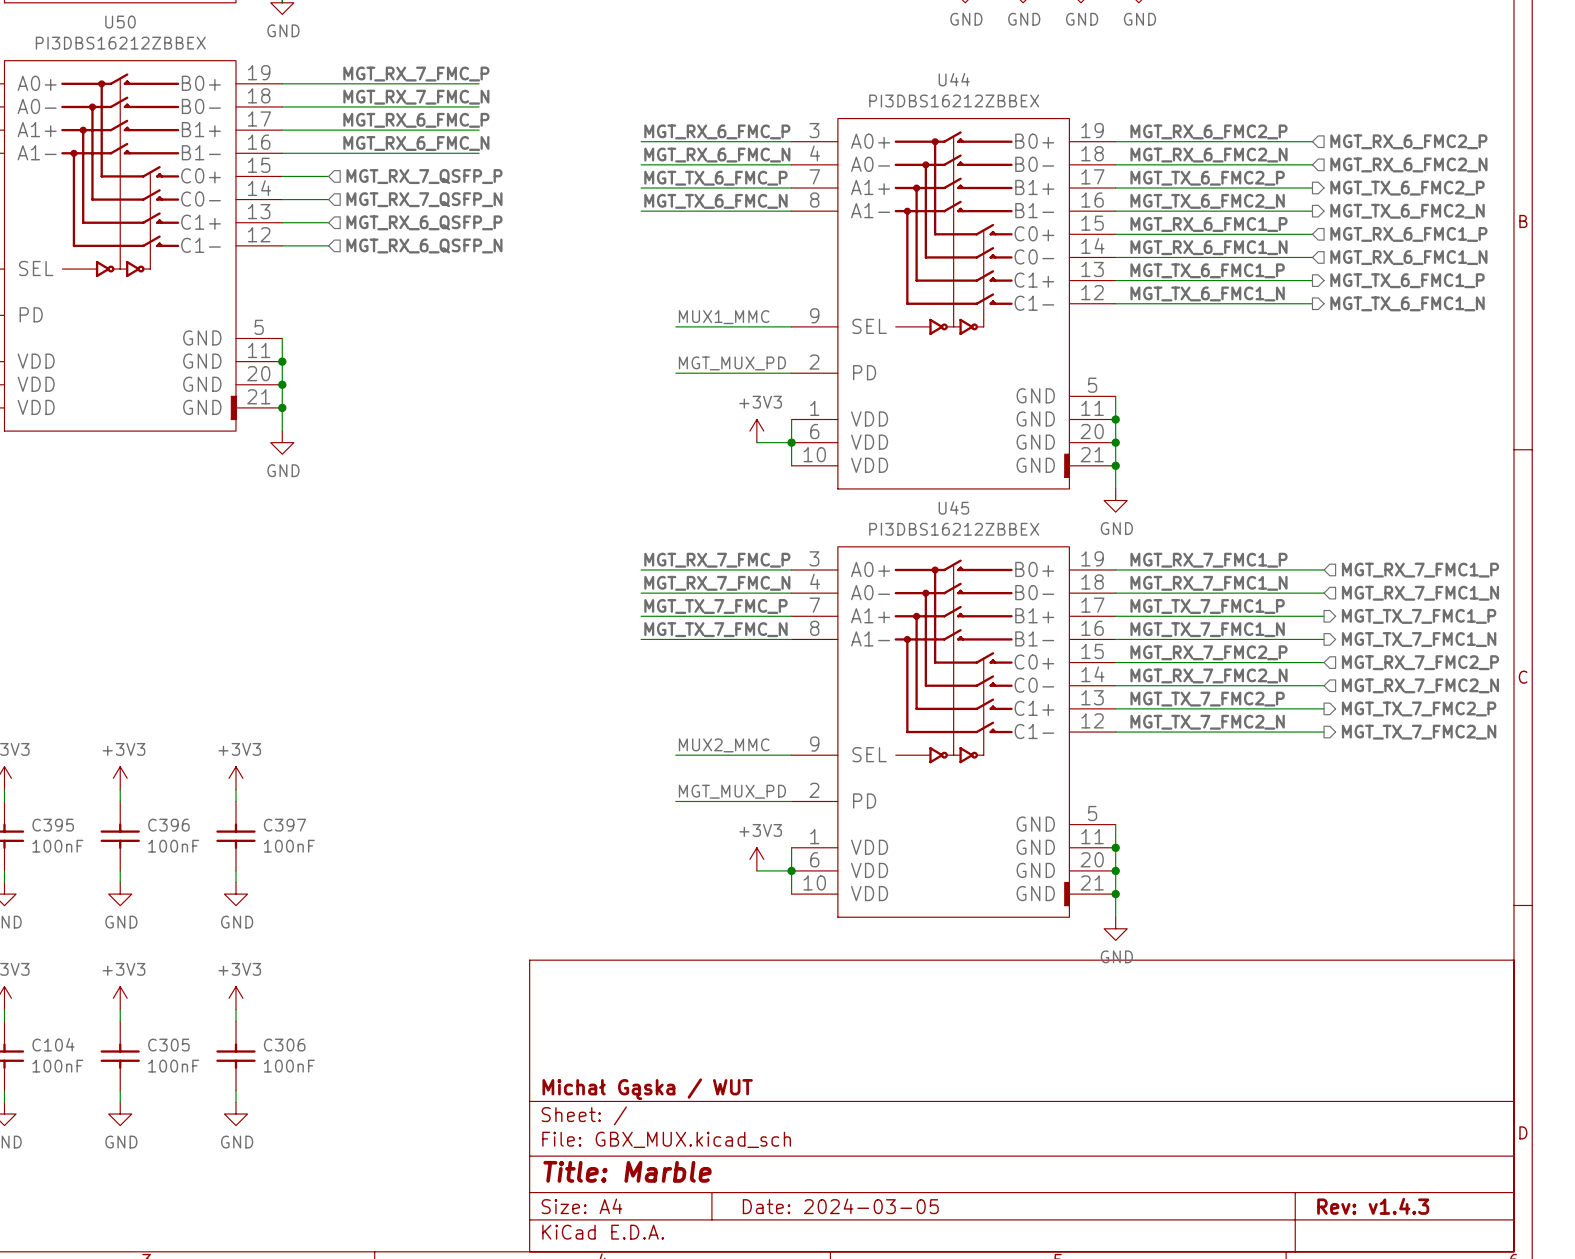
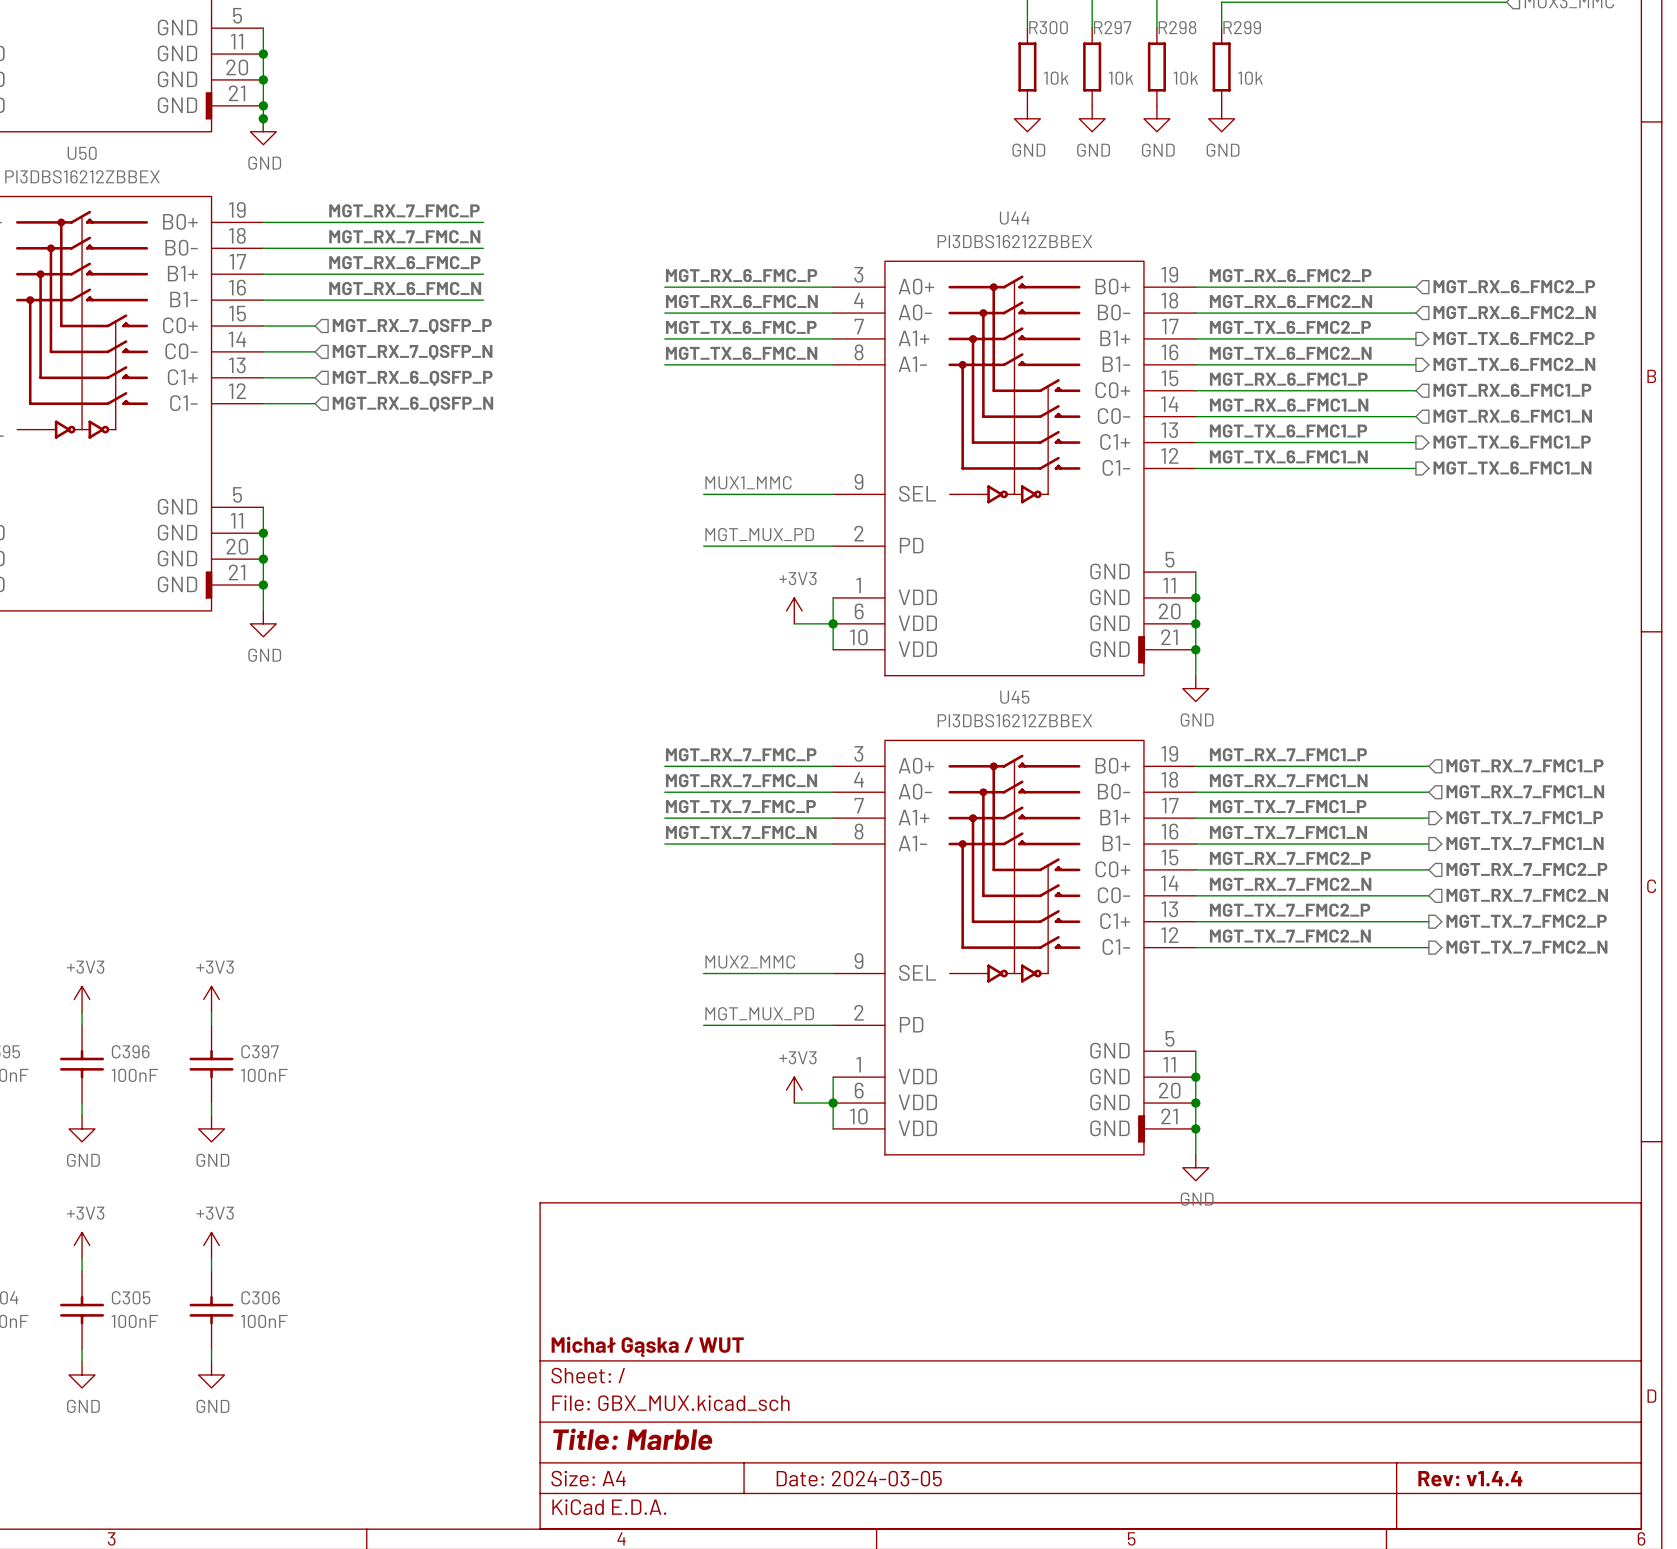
title block: Rev: v1.4.3 (1373, 1206) -> Rev: v1.4.4 (1470, 1478)

